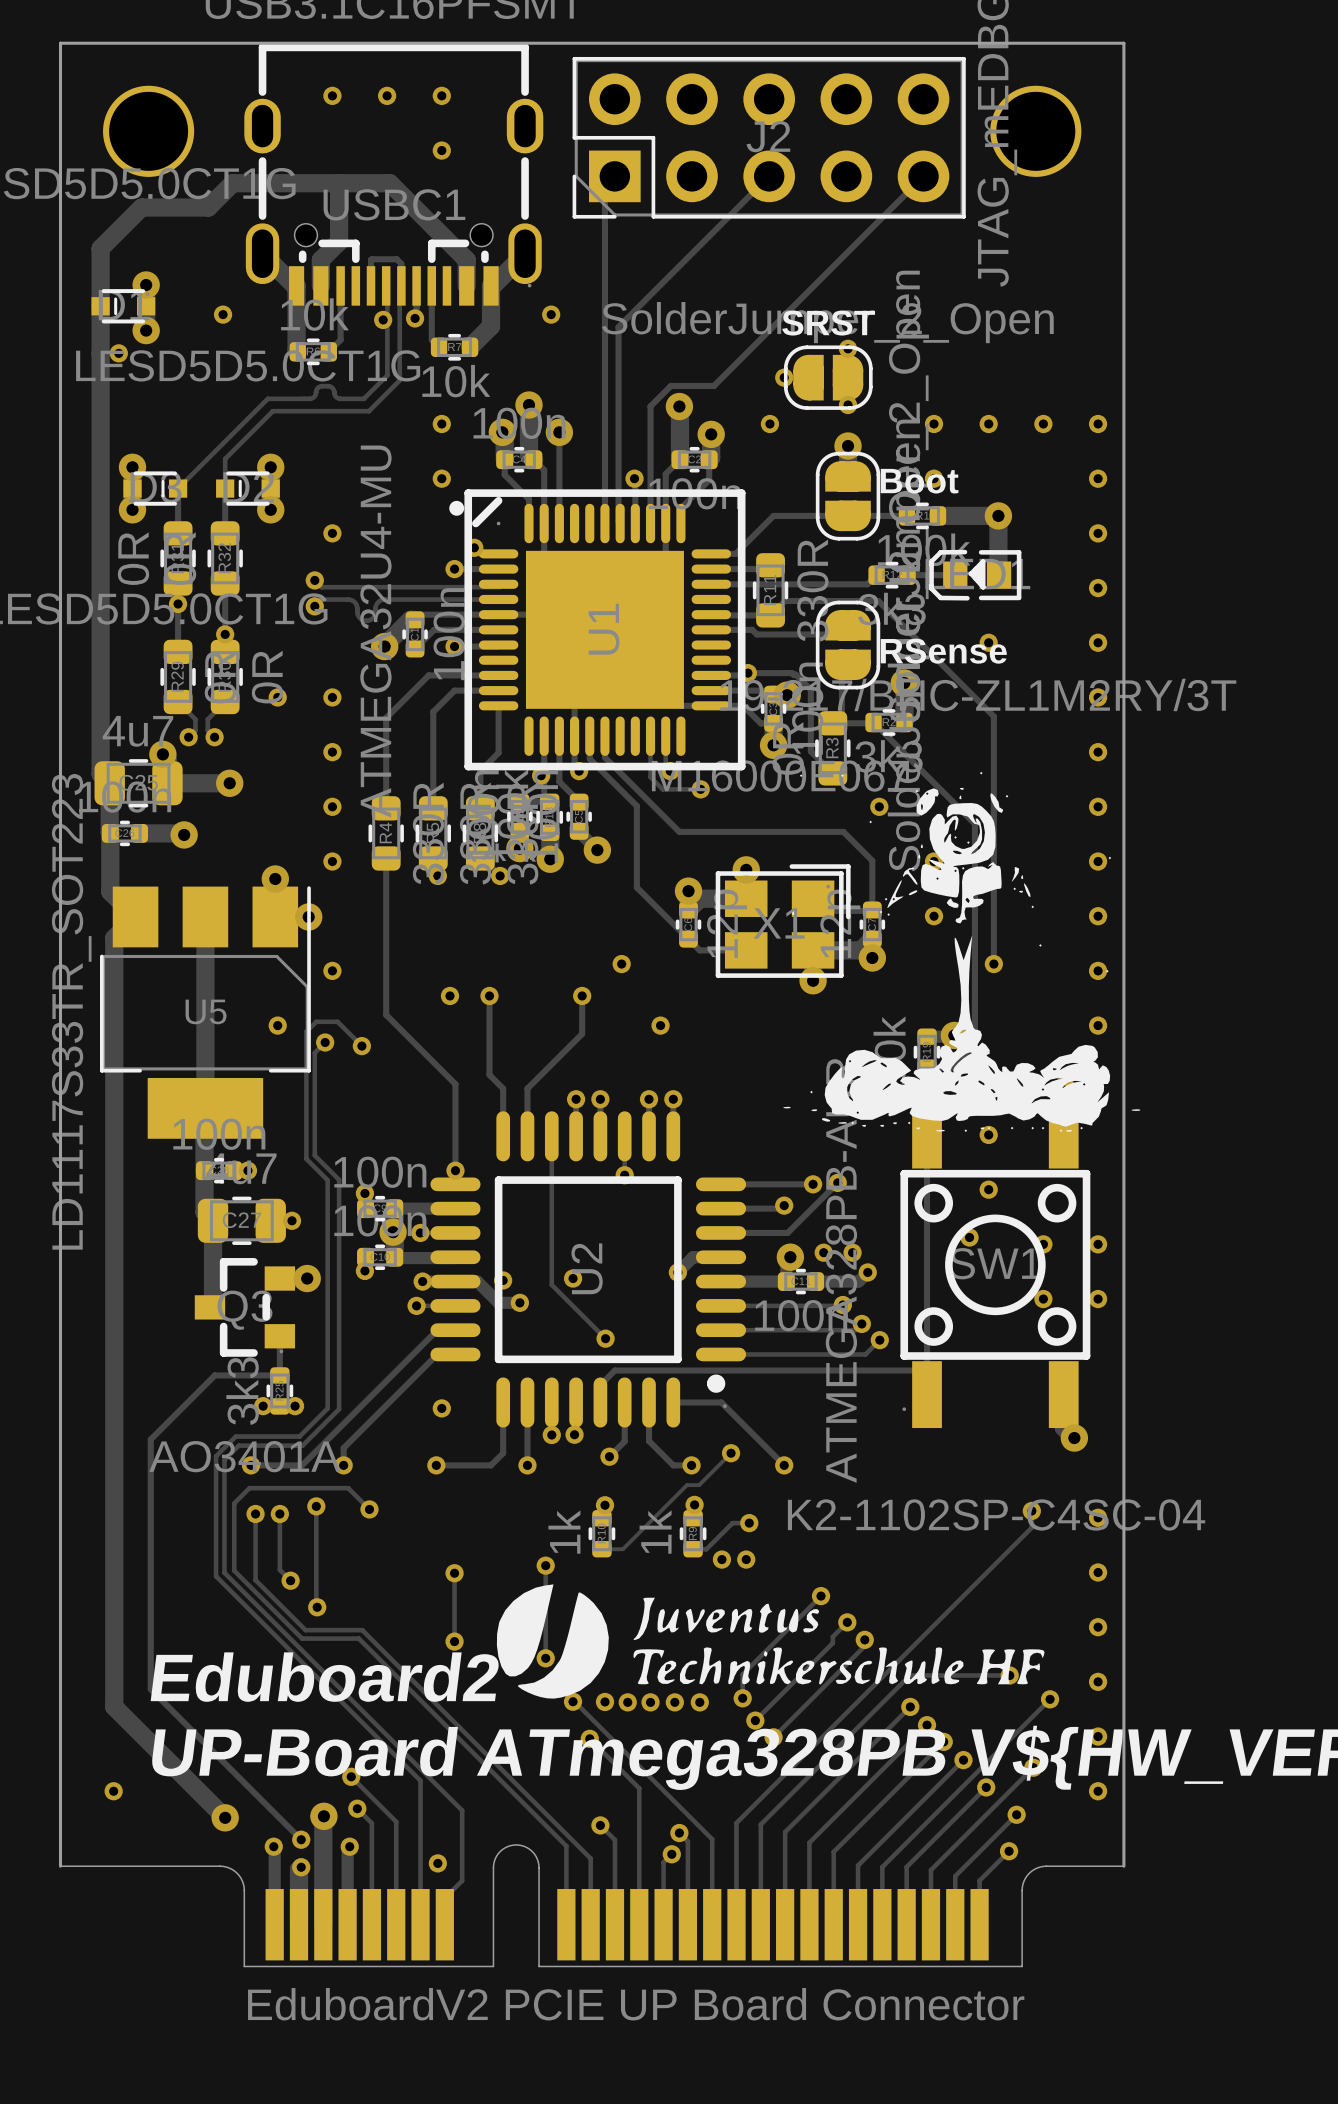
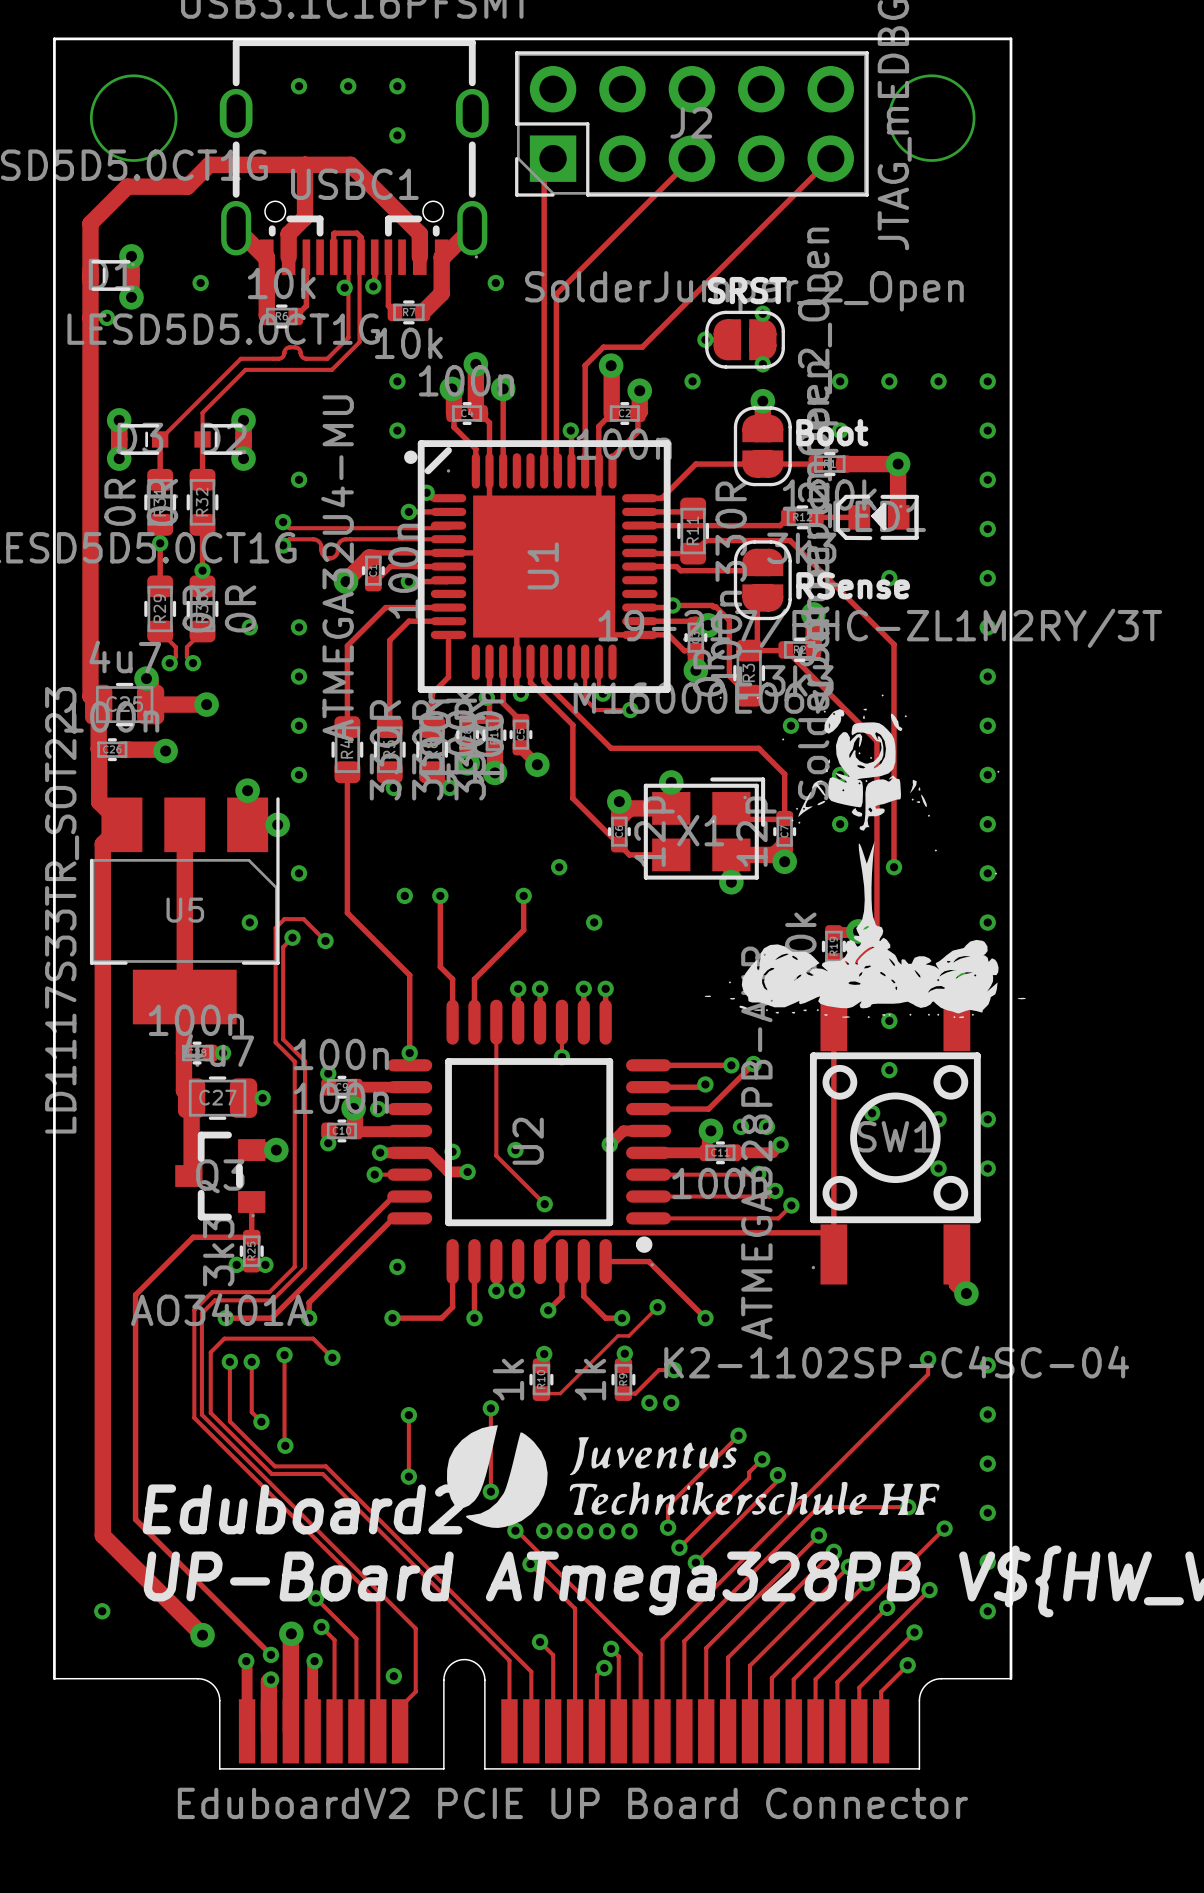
part footprint: [58, 41, 1126, 1968] -> [53, 37, 1013, 1770]

